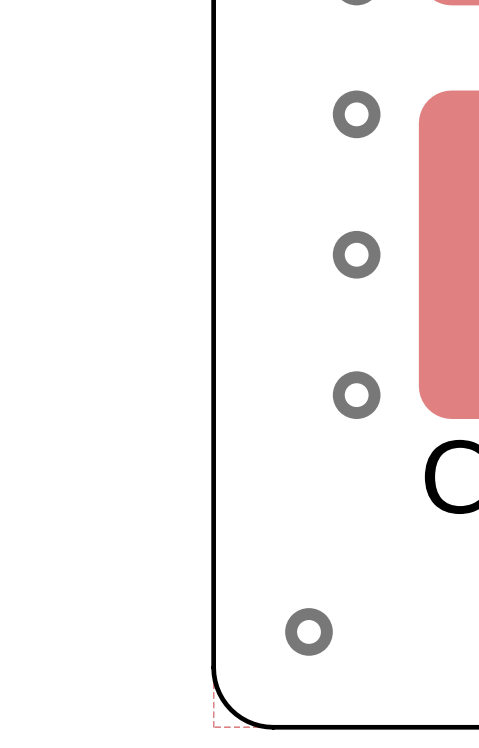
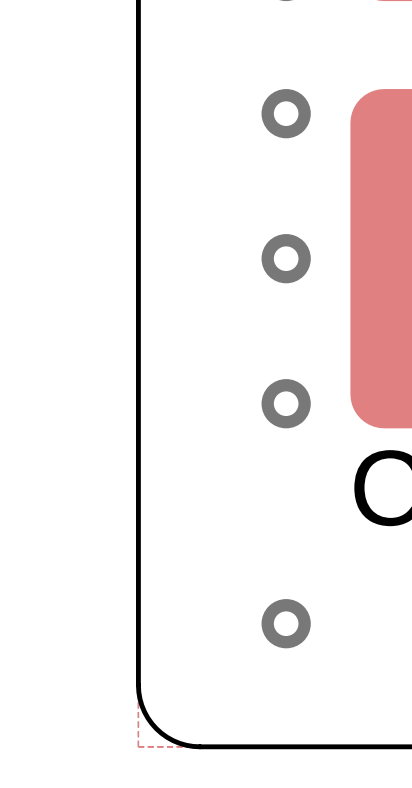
via position: (308, 631) -> (286, 623)

